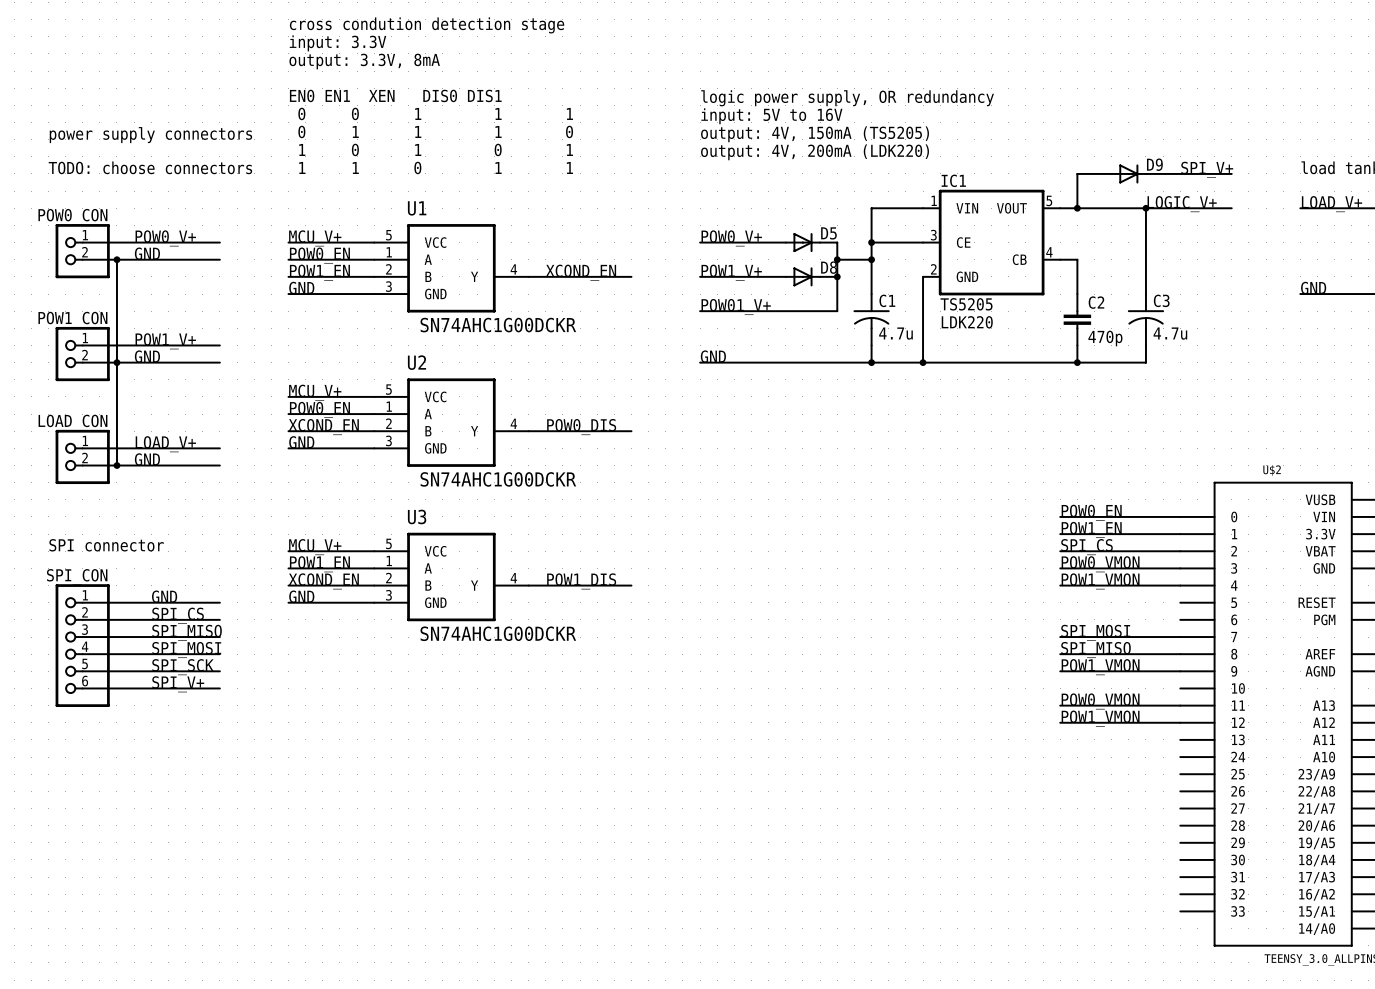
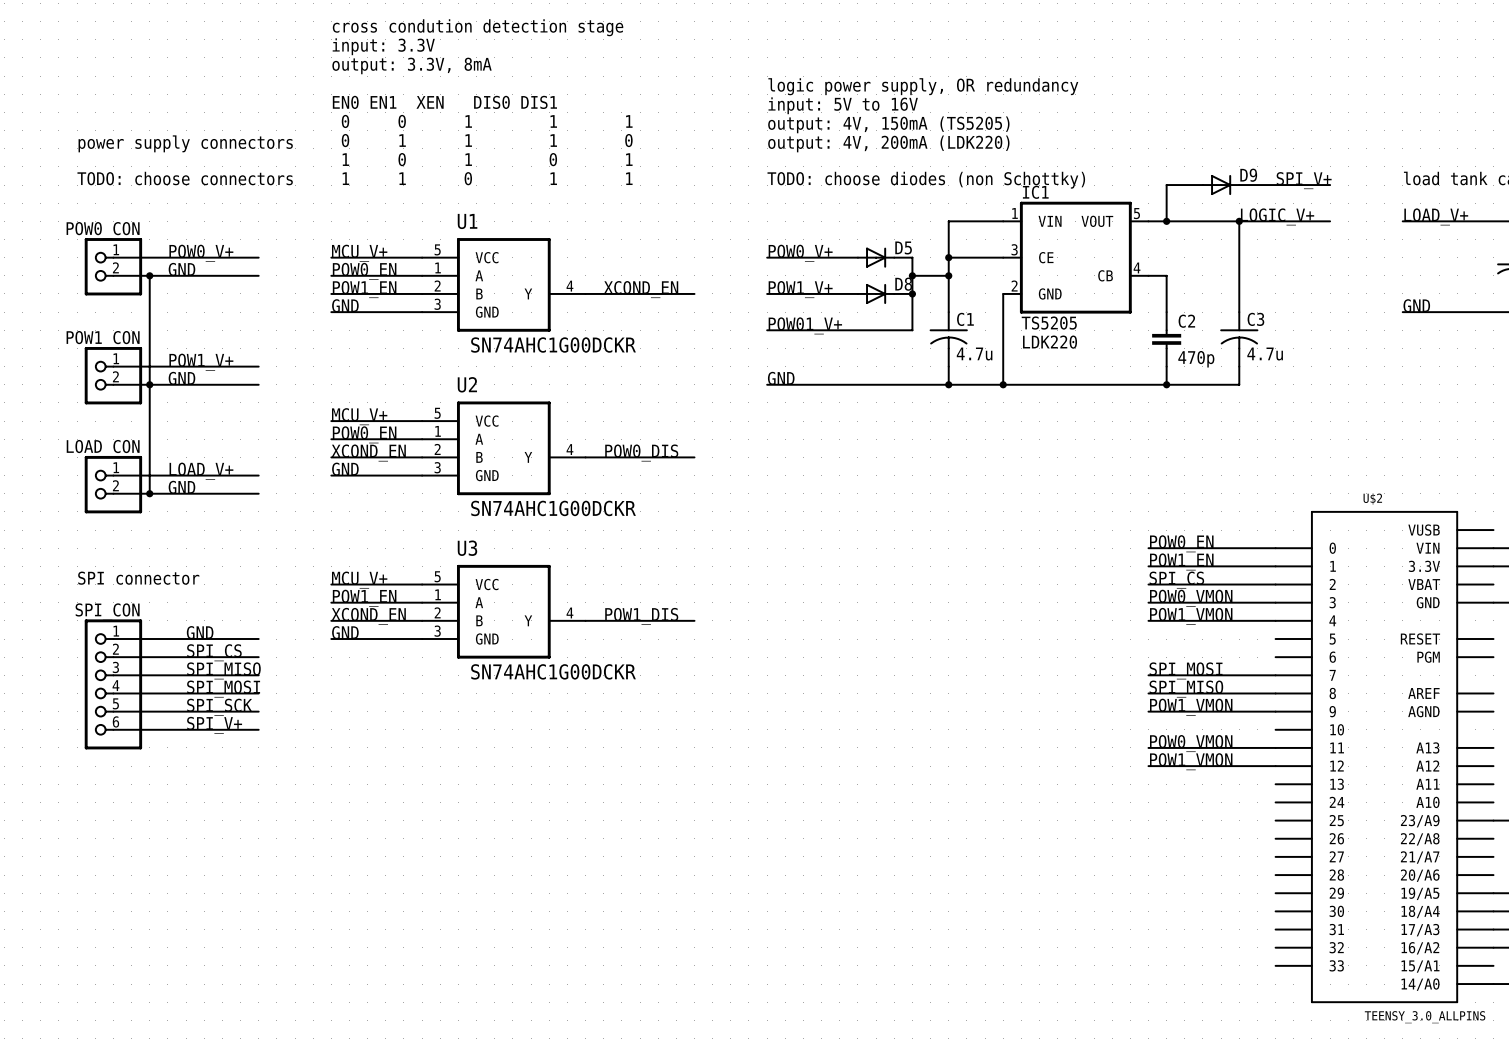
text: none -> logic power supply, OR redundancy (923, 86)
text: logic power supply, OR redundancy (847, 98) -> input: 5V to 16V (843, 105)
text: input: 5V to 16V (771, 116) -> output: 4V, 150mA (TS5205) (888, 124)
text: output: 4V, 150mA (TS5205) (815, 134) -> output: 4V, 200mA (LDK220) (888, 143)
text: output: 4V, 200mA (LDK220) (815, 152) -> none
text: none -> TODO: choose diodes (non Schottky) (926, 180)

